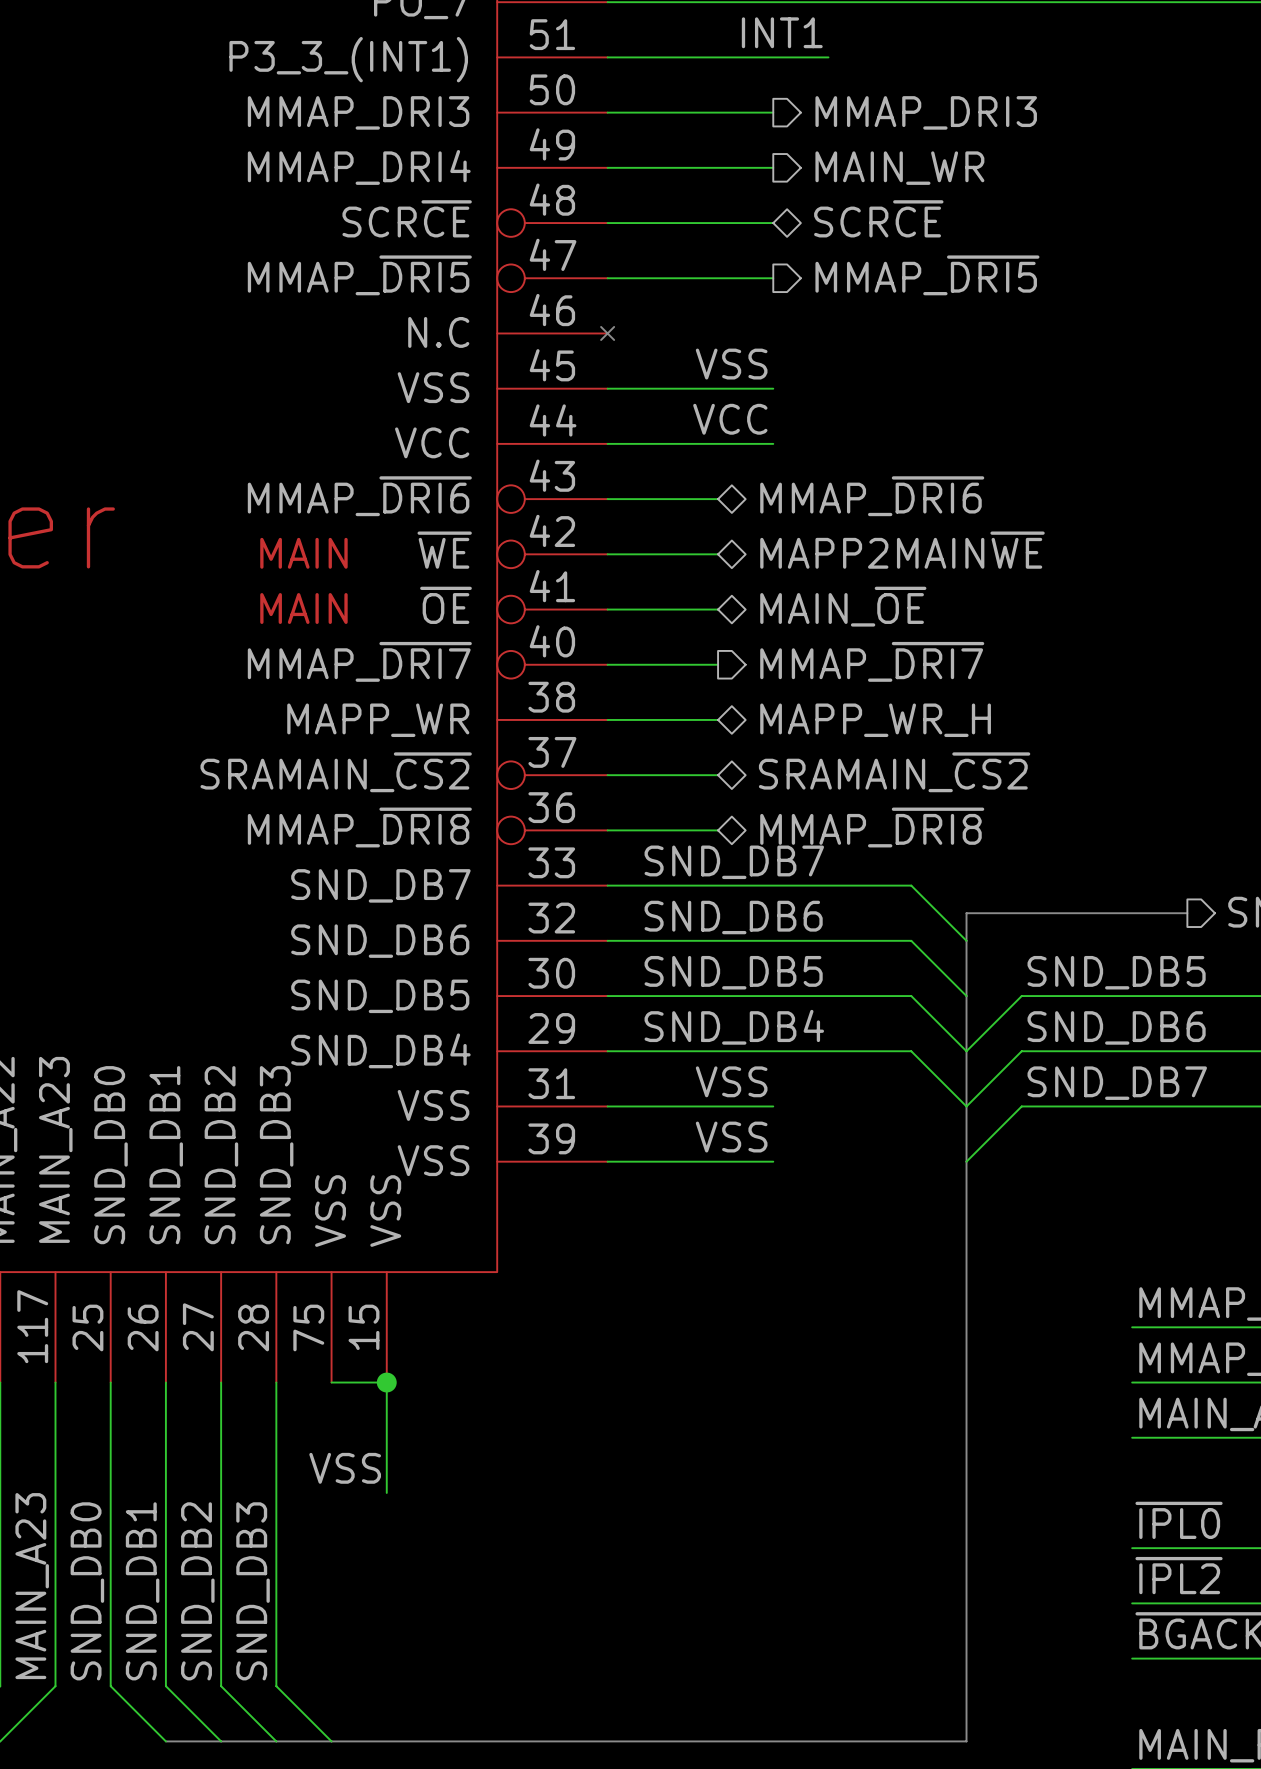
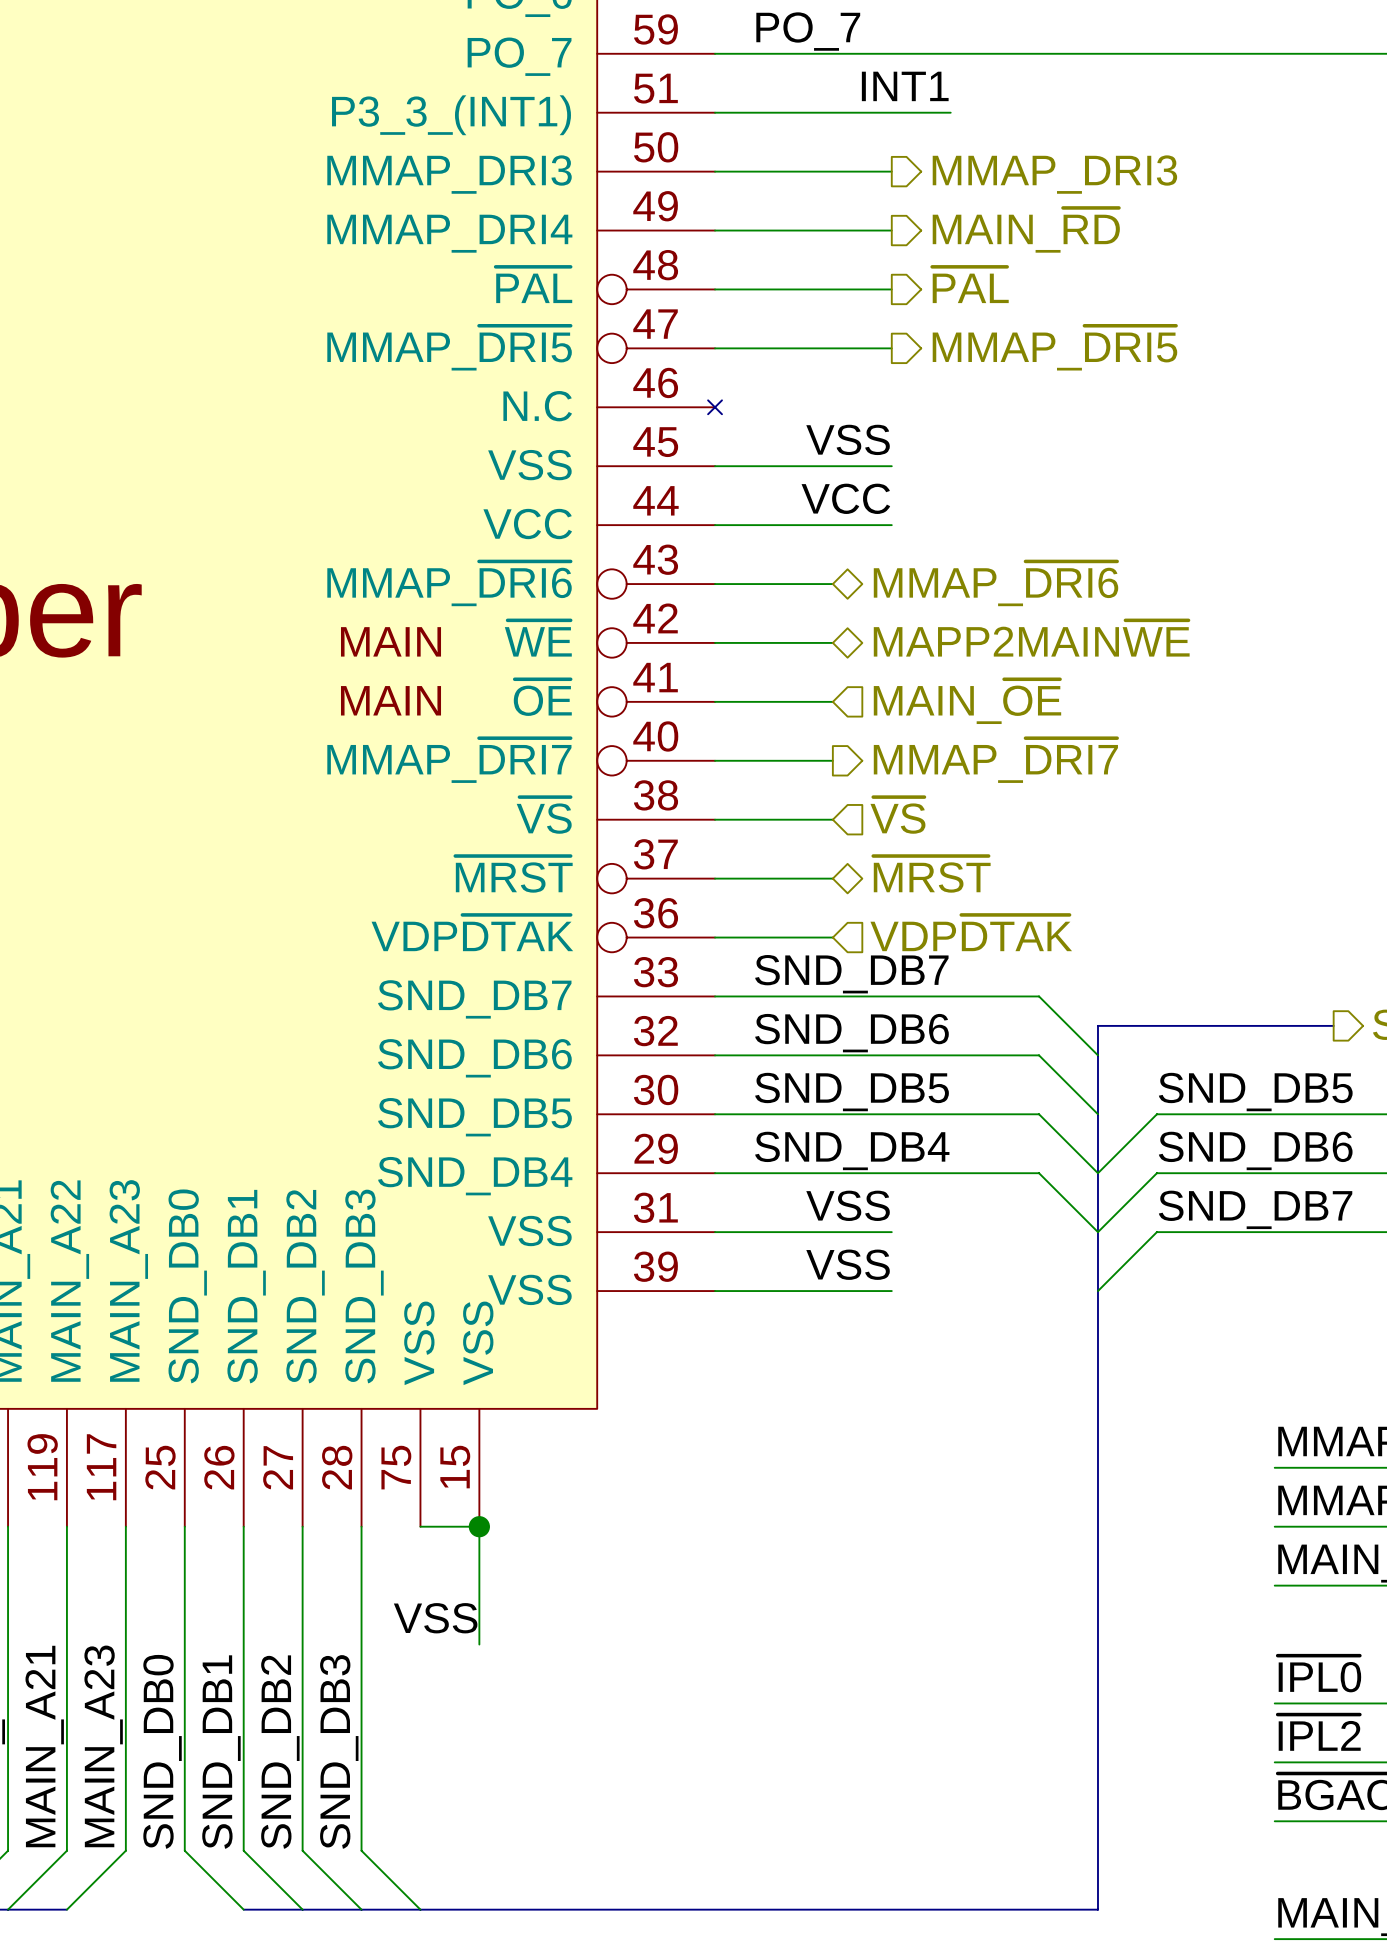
hierarchical label: MAIN_WR (899, 168) -> MAIN_~{RD} (1026, 230)
part pin name: SCR~{CE} (407, 218) -> ~{PAL} (533, 284)
hierarchical label shape: bidirectional (878, 218) -> output (970, 284)
hierarchical label: SCR~{CE} (878, 218) -> ~{PAL} (970, 284)
hierarchical label shape: bidirectional (843, 606) -> input (967, 701)
part pin name: MAPP_WR (378, 720) -> ~{VS} (544, 815)
hierarchical label shape: bidirectional (875, 720) -> input (897, 815)
hierarchical label: MAPP_WR_H (875, 720) -> ~{VS} (897, 815)
part pin name: SRAMAIN_~{CS2} (336, 772) -> ~{MRST} (513, 874)
hierarchical label: SRAMAIN_~{CS2} (894, 772) -> ~{MRST} (931, 874)
part pin name: MMAP_~{DRI8} (359, 827) -> VDP~{DTAK} (472, 933)
hierarchical label shape: bidirectional (872, 827) -> input (971, 933)
hierarchical label: MMAP_~{DRI8} (872, 827) -> VDP~{DTAK} (971, 933)

